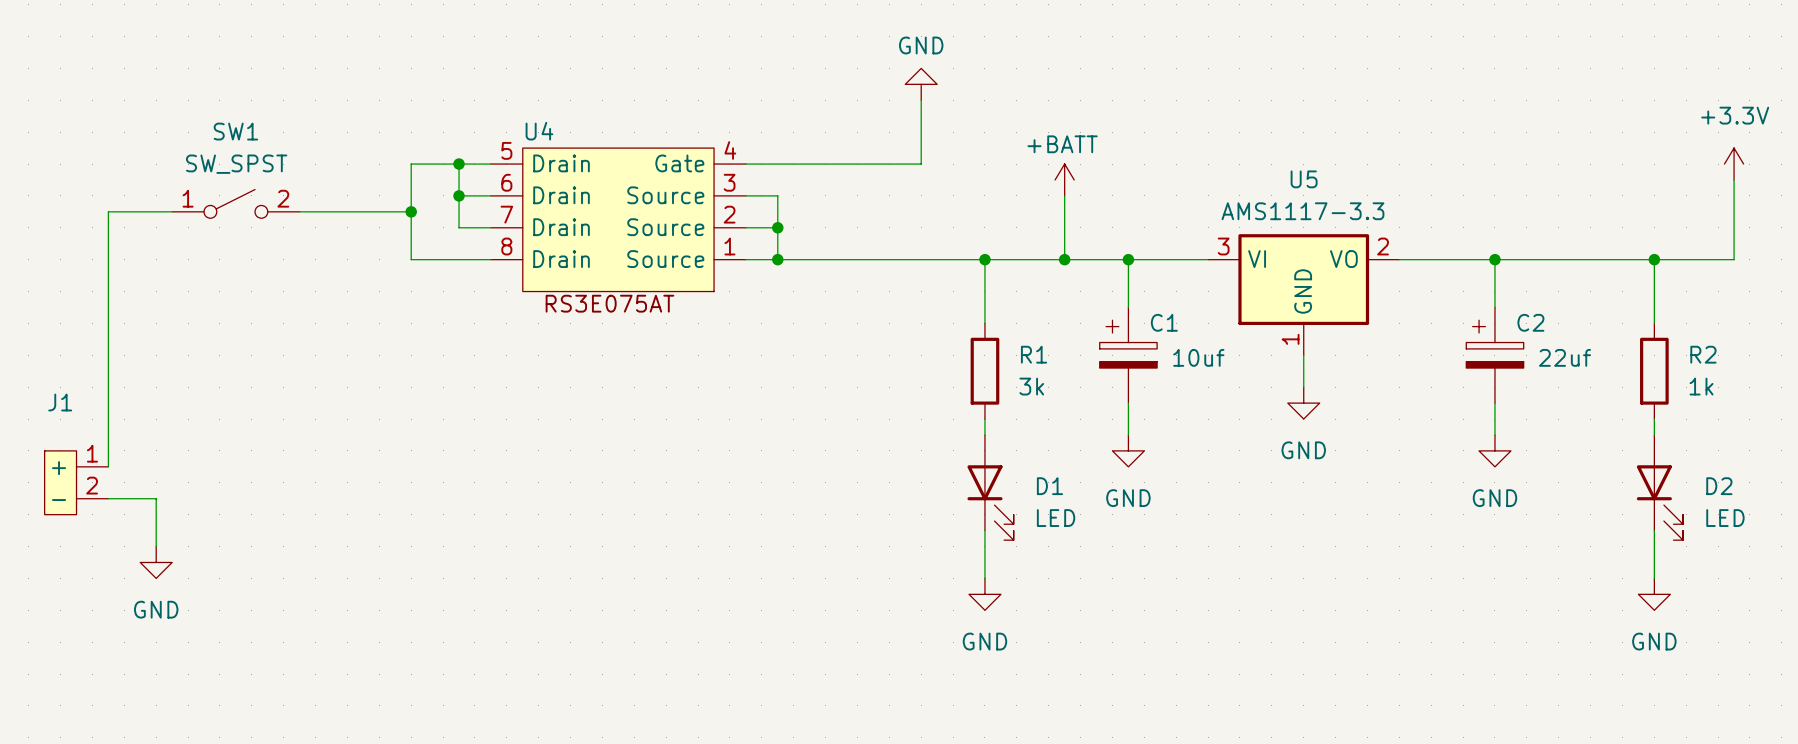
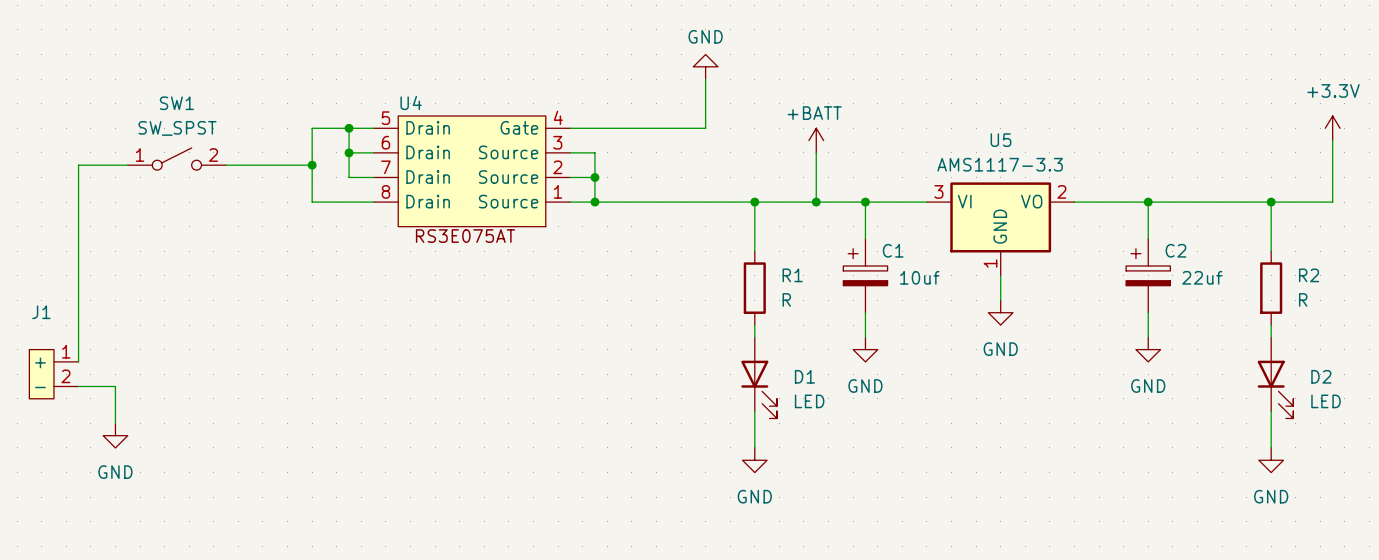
R1 value: 3k (1031, 386) -> R (786, 299)
R2 value: 1k (1701, 386) -> R (1303, 299)

